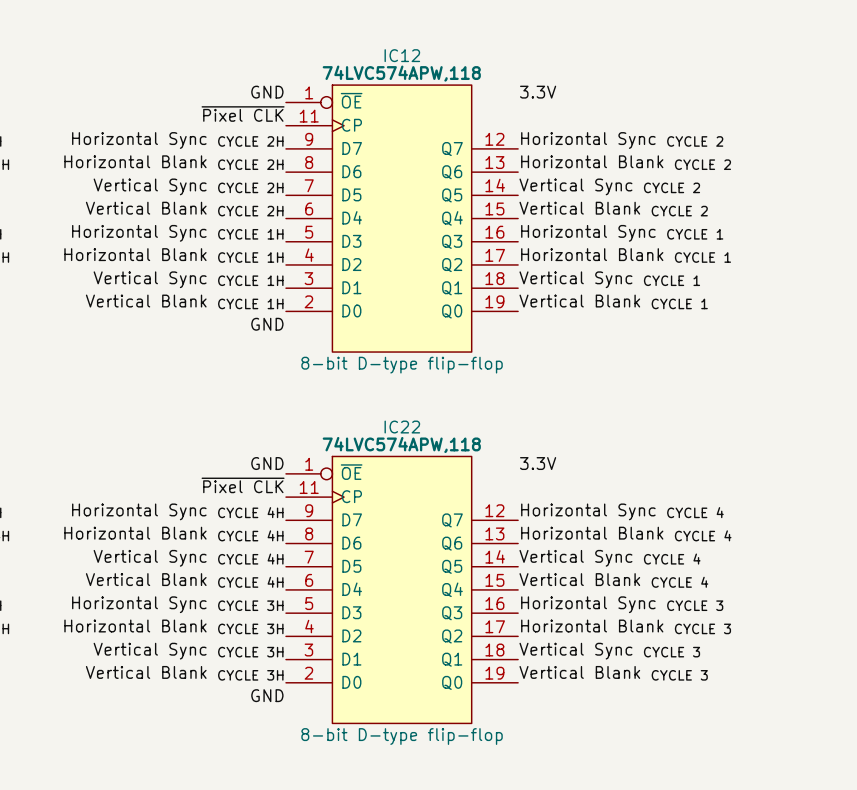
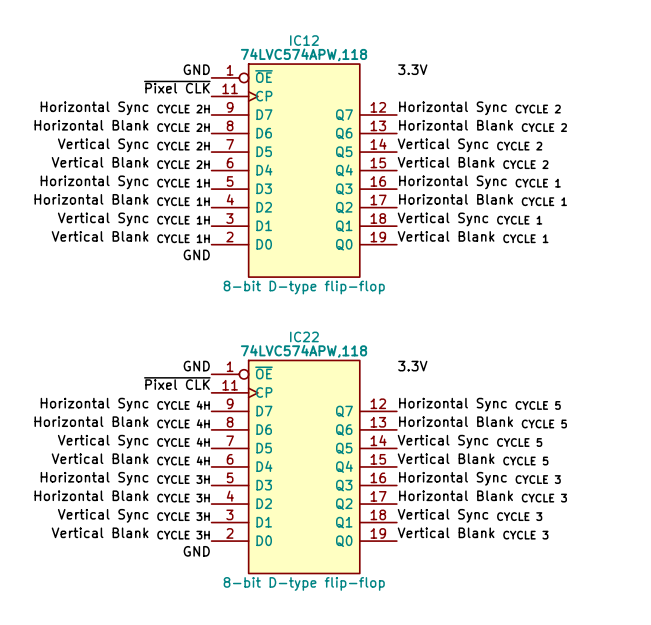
label: Horizontal Sync CYCLE 4 (622, 511) -> Horizontal Sync CYCLE 5 (479, 404)
label: Horizontal Blank CYCLE 4 (626, 534) -> Horizontal Blank CYCLE 5 (483, 422)
label: Vertical Sync CYCLE 4 (609, 558) -> Vertical Sync CYCLE 5 (470, 441)
label: Vertical Blank CYCLE 4 (613, 580) -> Vertical Blank CYCLE 5 (473, 459)

